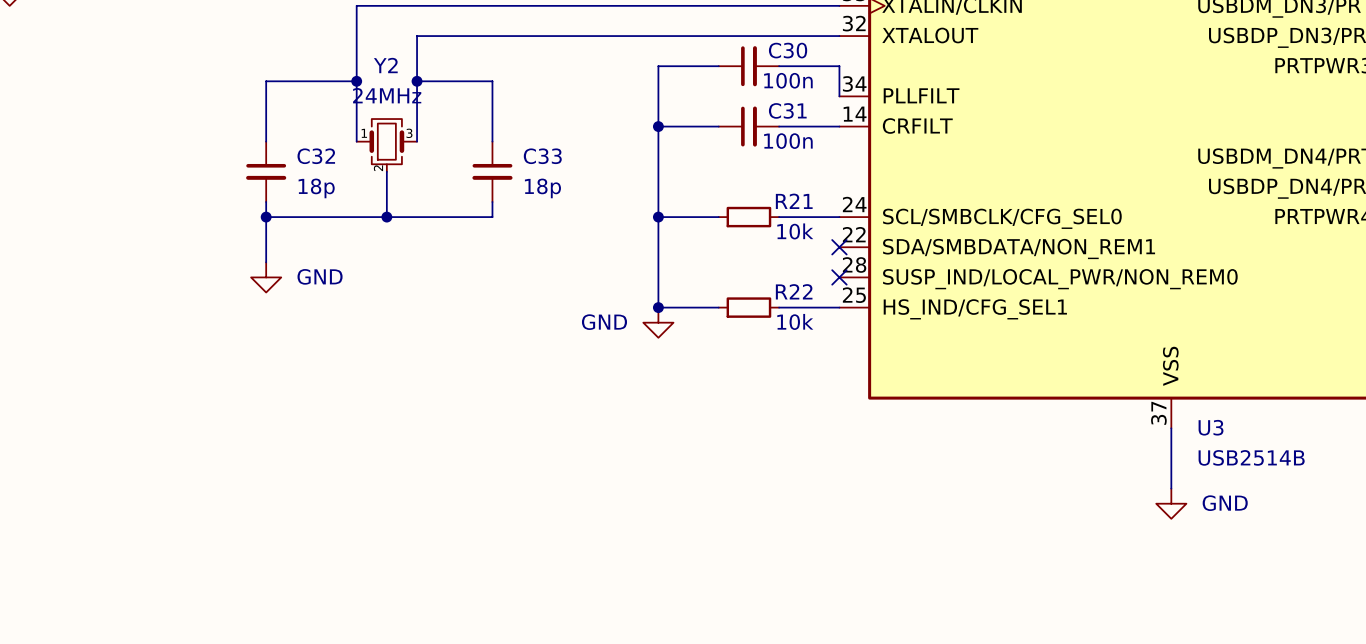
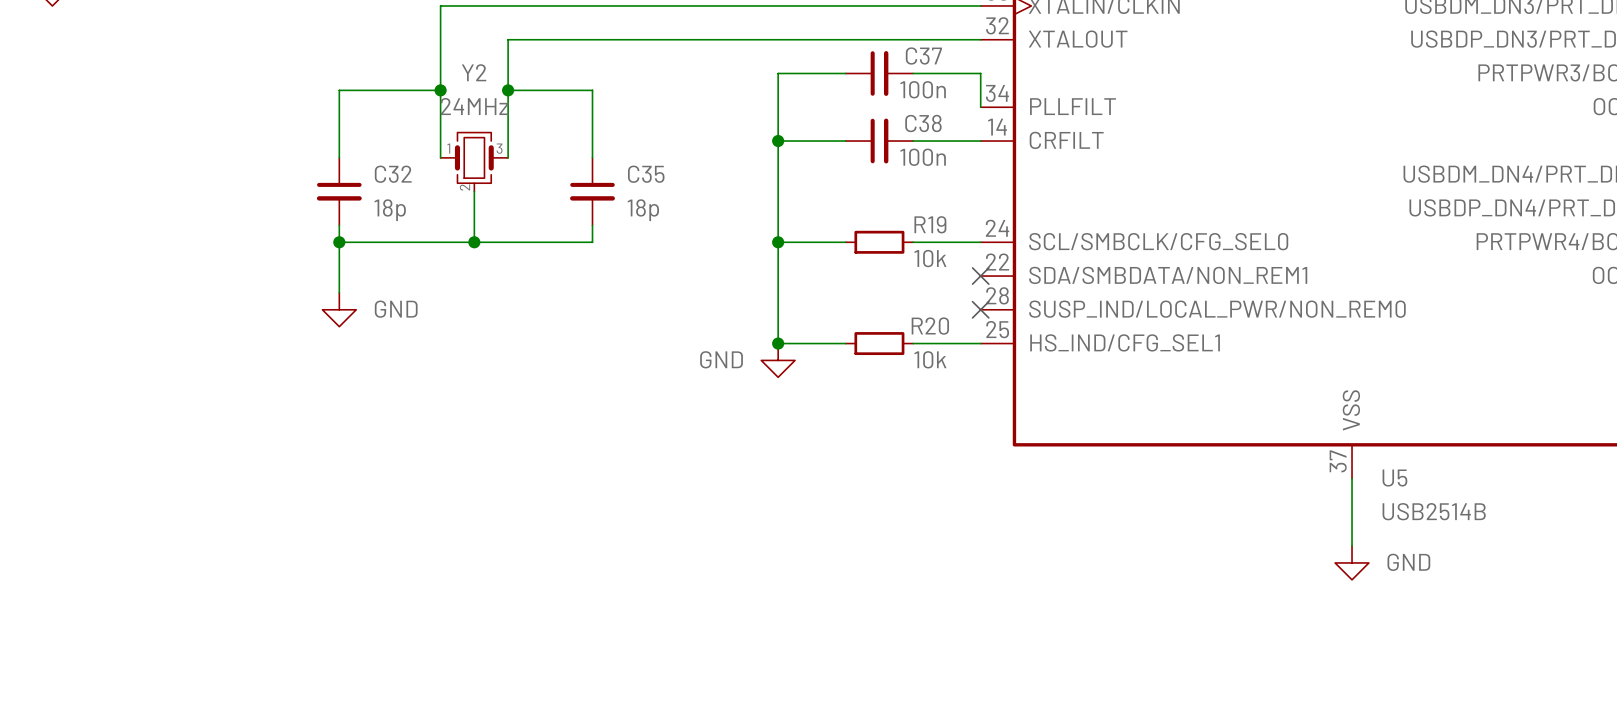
C30 name: C30 (788, 50) -> C37 (923, 56)
C31 name: C31 (787, 110) -> C38 (923, 123)
C33 name: C33 (542, 156) -> C35 (646, 174)
R21 name: R21 (794, 201) -> R19 (930, 224)
R22 name: R22 (794, 291) -> R20 (930, 326)
U3 name: U3 (1211, 427) -> U5 (1394, 478)

